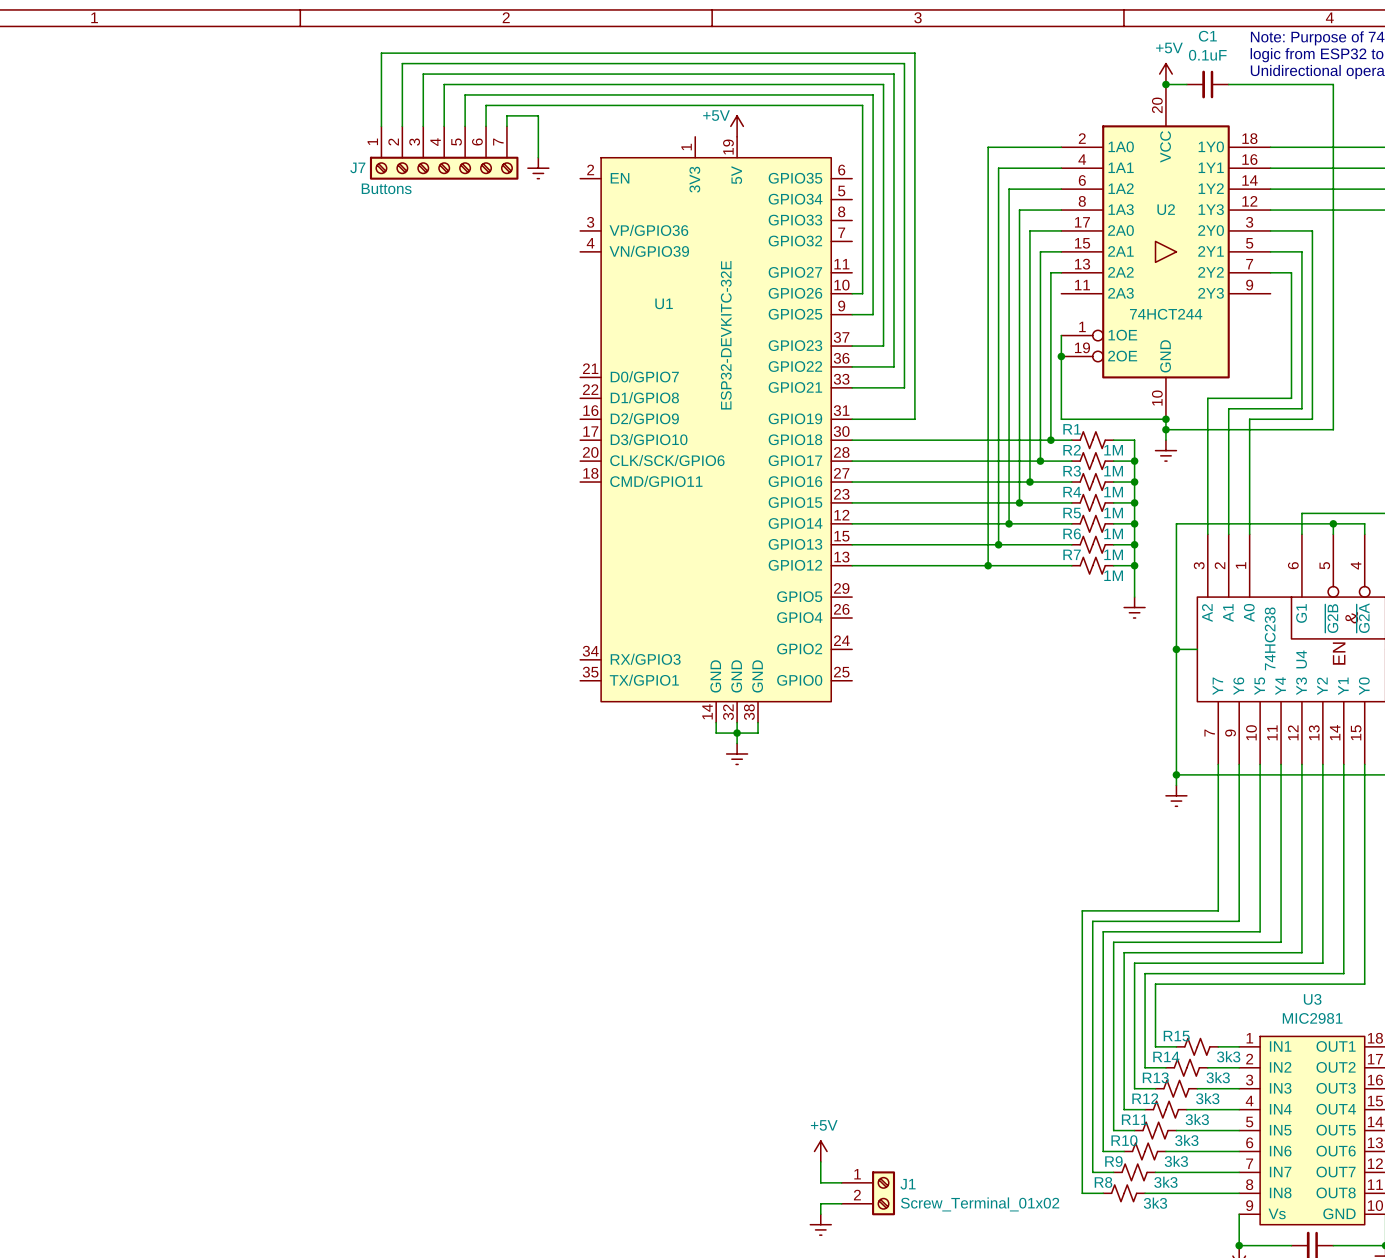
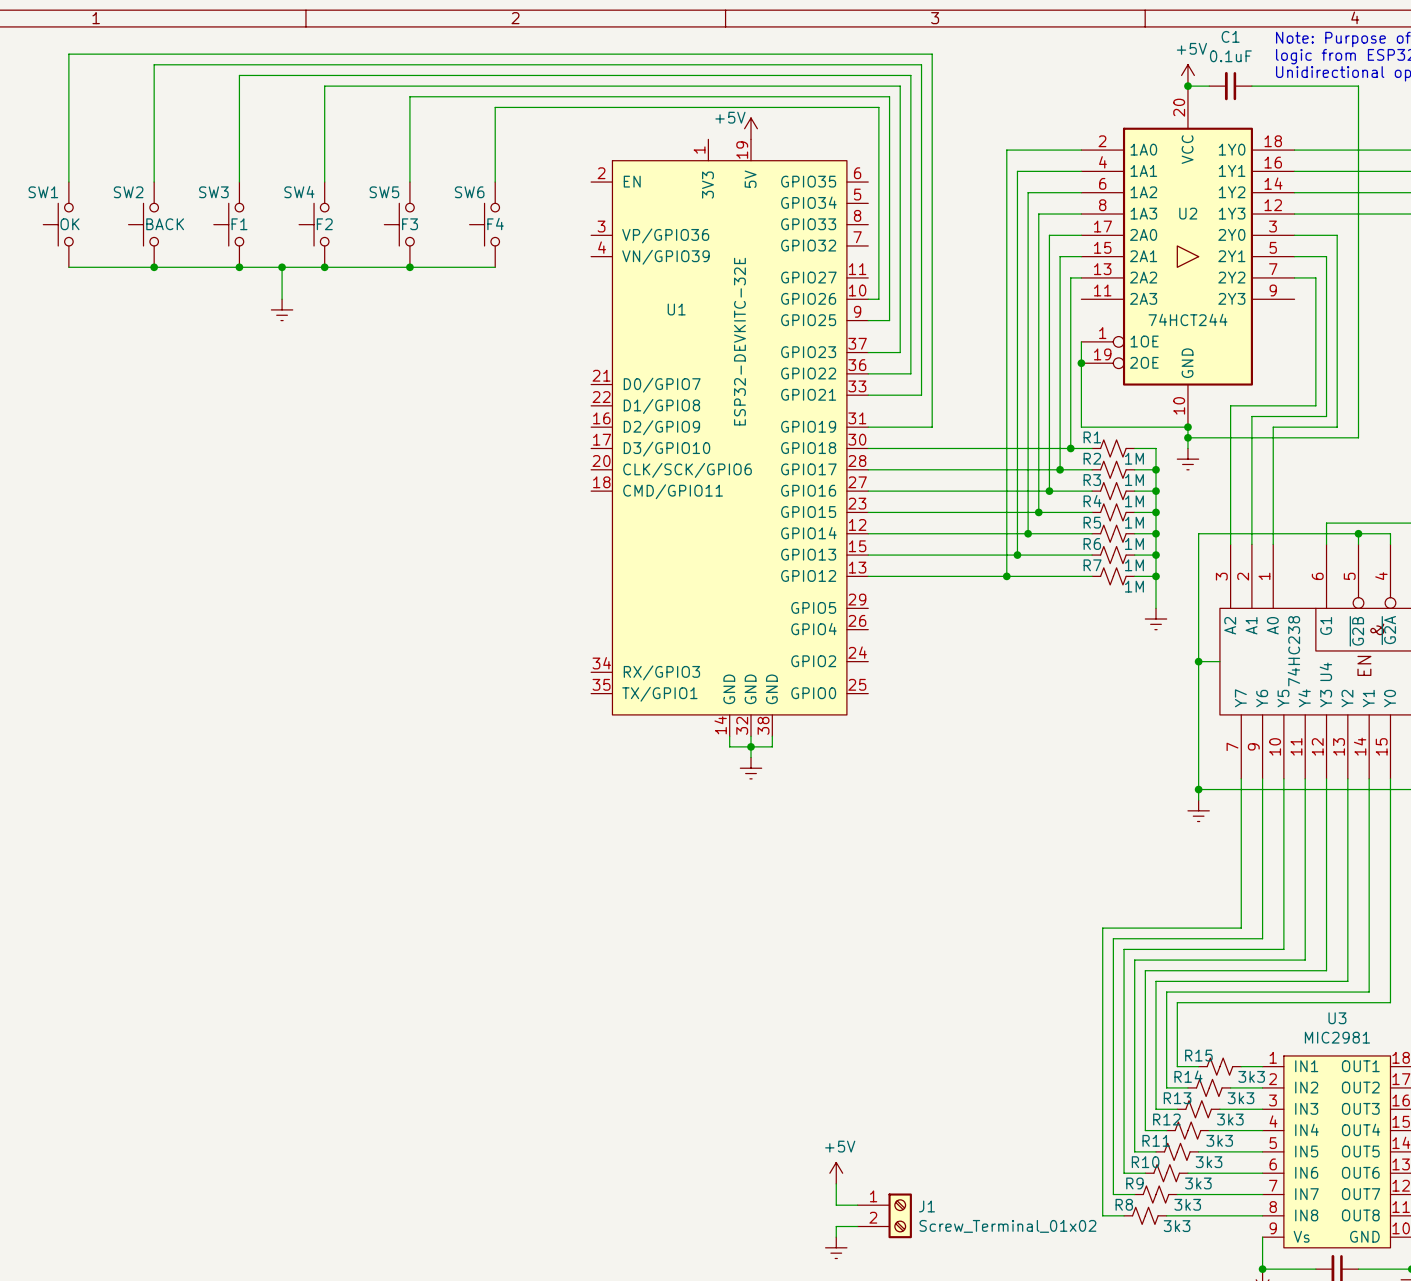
wire: (381, 53) (381, 126) -> (388, 54) (68, 54) (68, 182)
wire: (402, 63) (402, 94) -> (473, 96) (409, 96)
wire: none -> (409, 64) (154, 64) (154, 182)
wire: (423, 74) (423, 126) -> (431, 75) (239, 75) (239, 182)
wire: (444, 84) (444, 126) -> (452, 86) (324, 86) (324, 182)
wire: (465, 94) (465, 126) -> none
wire: (506, 126) (506, 115) (538, 115) (538, 157) -> none
J7: Buttons (444, 153) -> none
power symbol: (538, 168) -> none
SW1: none -> OK (58, 224)
SW2: none -> BACK (143, 224)
SW3: none -> F1 (228, 224)
SW4: none -> F2 (314, 224)
SW5: none -> F3 (399, 224)
SW6: none -> F4 (484, 224)
wire: none -> (68, 267) (495, 267)
junction: none -> (154, 267)
junction: none -> (239, 267)
wire: none -> (282, 267) (282, 299)
junction: none -> (282, 267)
junction: none -> (324, 267)
junction: none -> (409, 267)
power symbol: none -> (282, 309)

